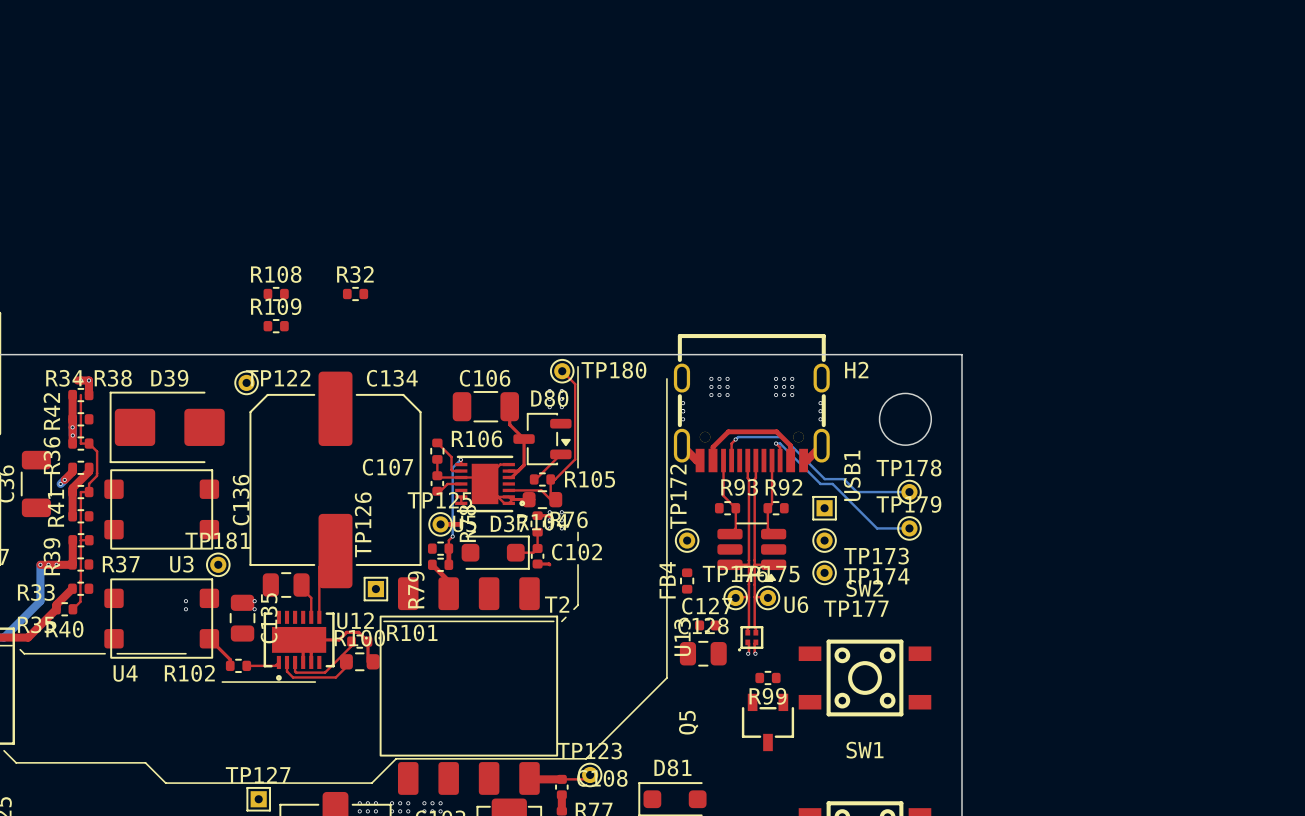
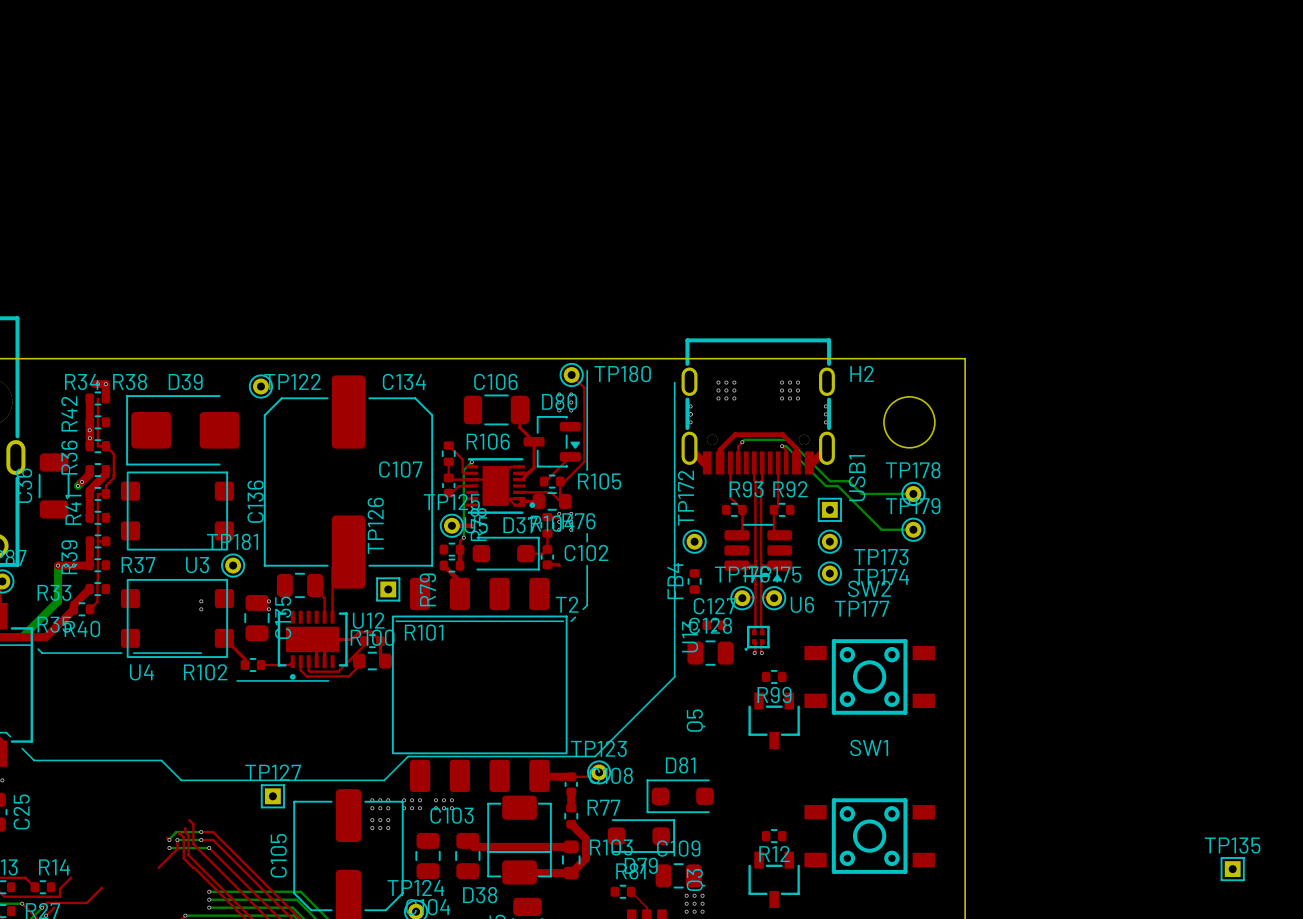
R108: (276, 294) -> none
R32: (355, 294) -> none
R109: (276, 326) -> none

